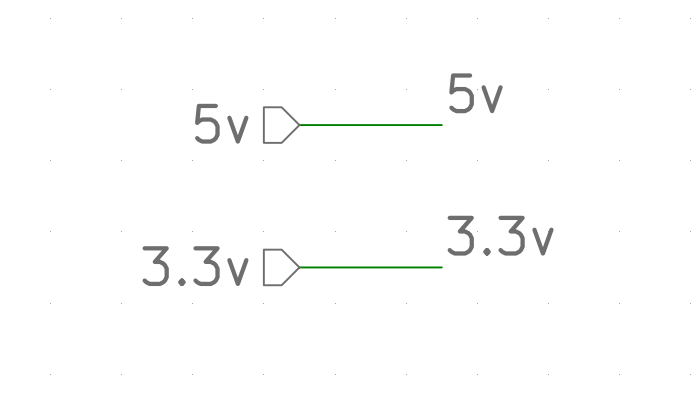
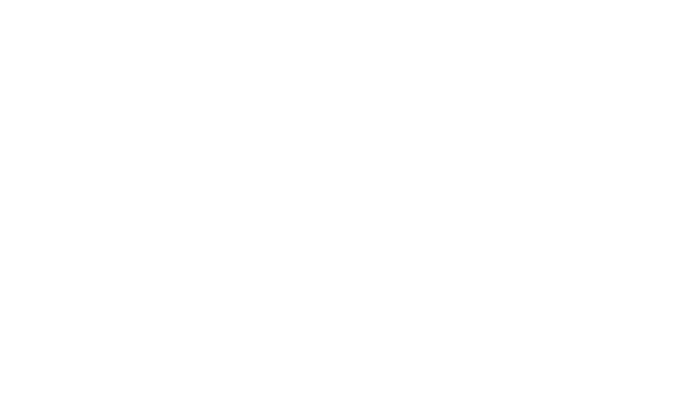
label: 5v (475, 93) -> none
hierarchical label: 5v (221, 123) -> none
wire: (299, 125) (441, 125) -> none
label: 3.3v (500, 235) -> none
hierarchical label: 3.3v (195, 266) -> none
wire: (299, 267) (441, 267) -> none

